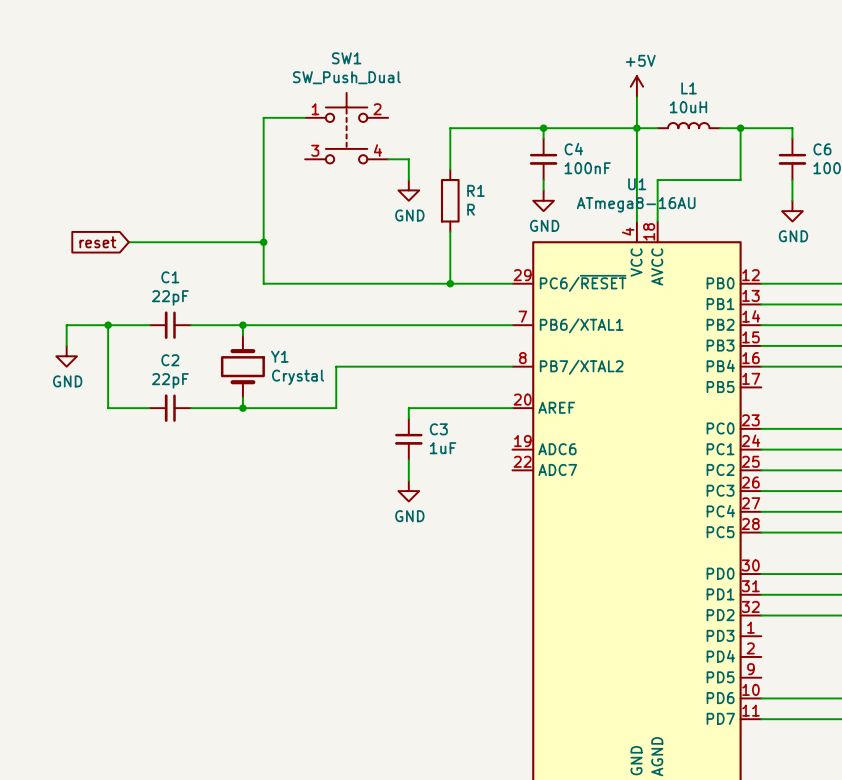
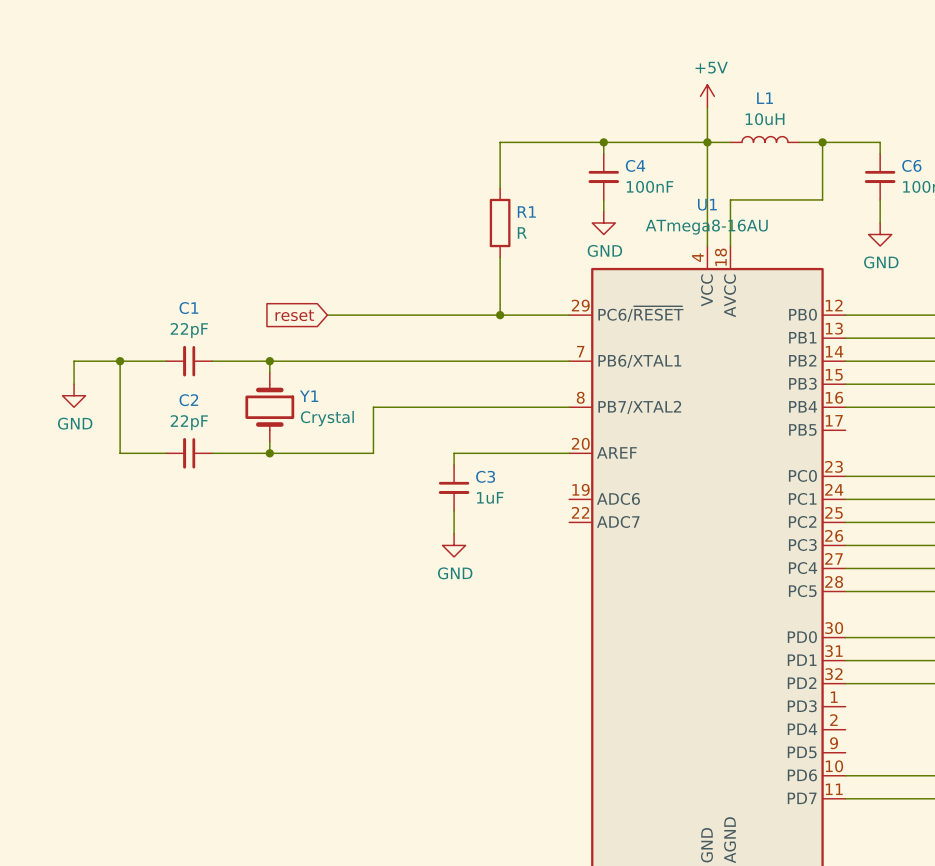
wire: (305, 117) (263, 117) (263, 283) (294, 283) -> none
SW1: SW_Push_Dual (346, 128) -> none
wire: (388, 159) (408, 159) (408, 180) -> none
power symbol: GND (408, 190) -> none
global label position: reset (97, 242) -> reset (294, 315)
wire: (128, 242) (263, 242) -> none
junction: (263, 242) -> none

